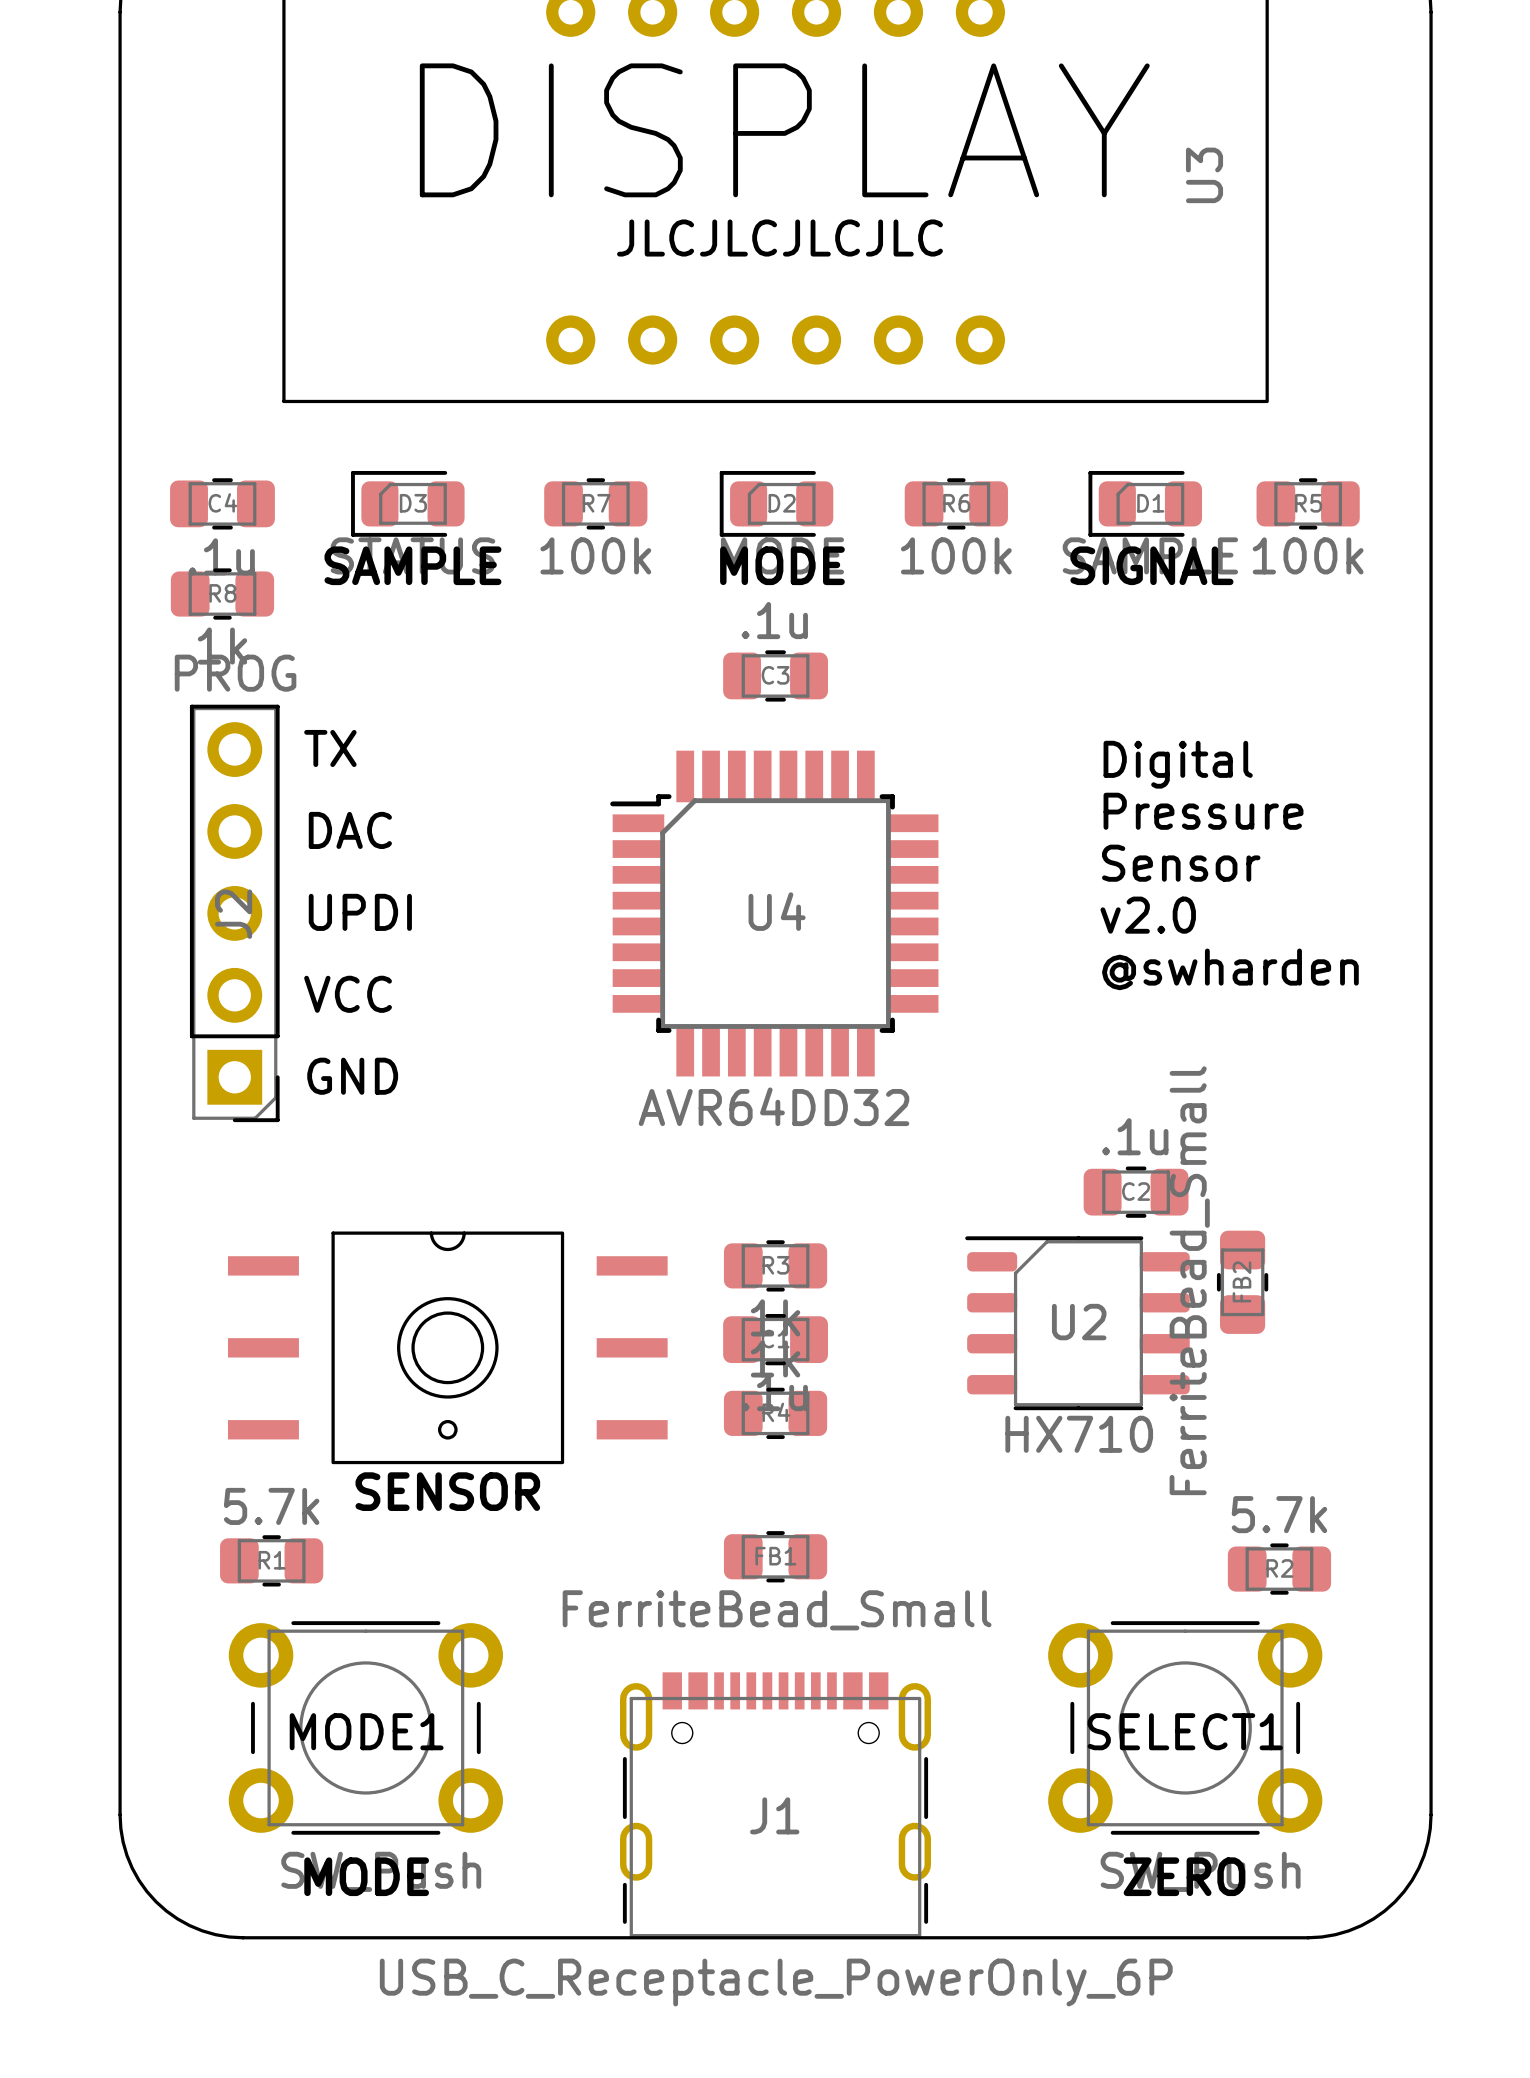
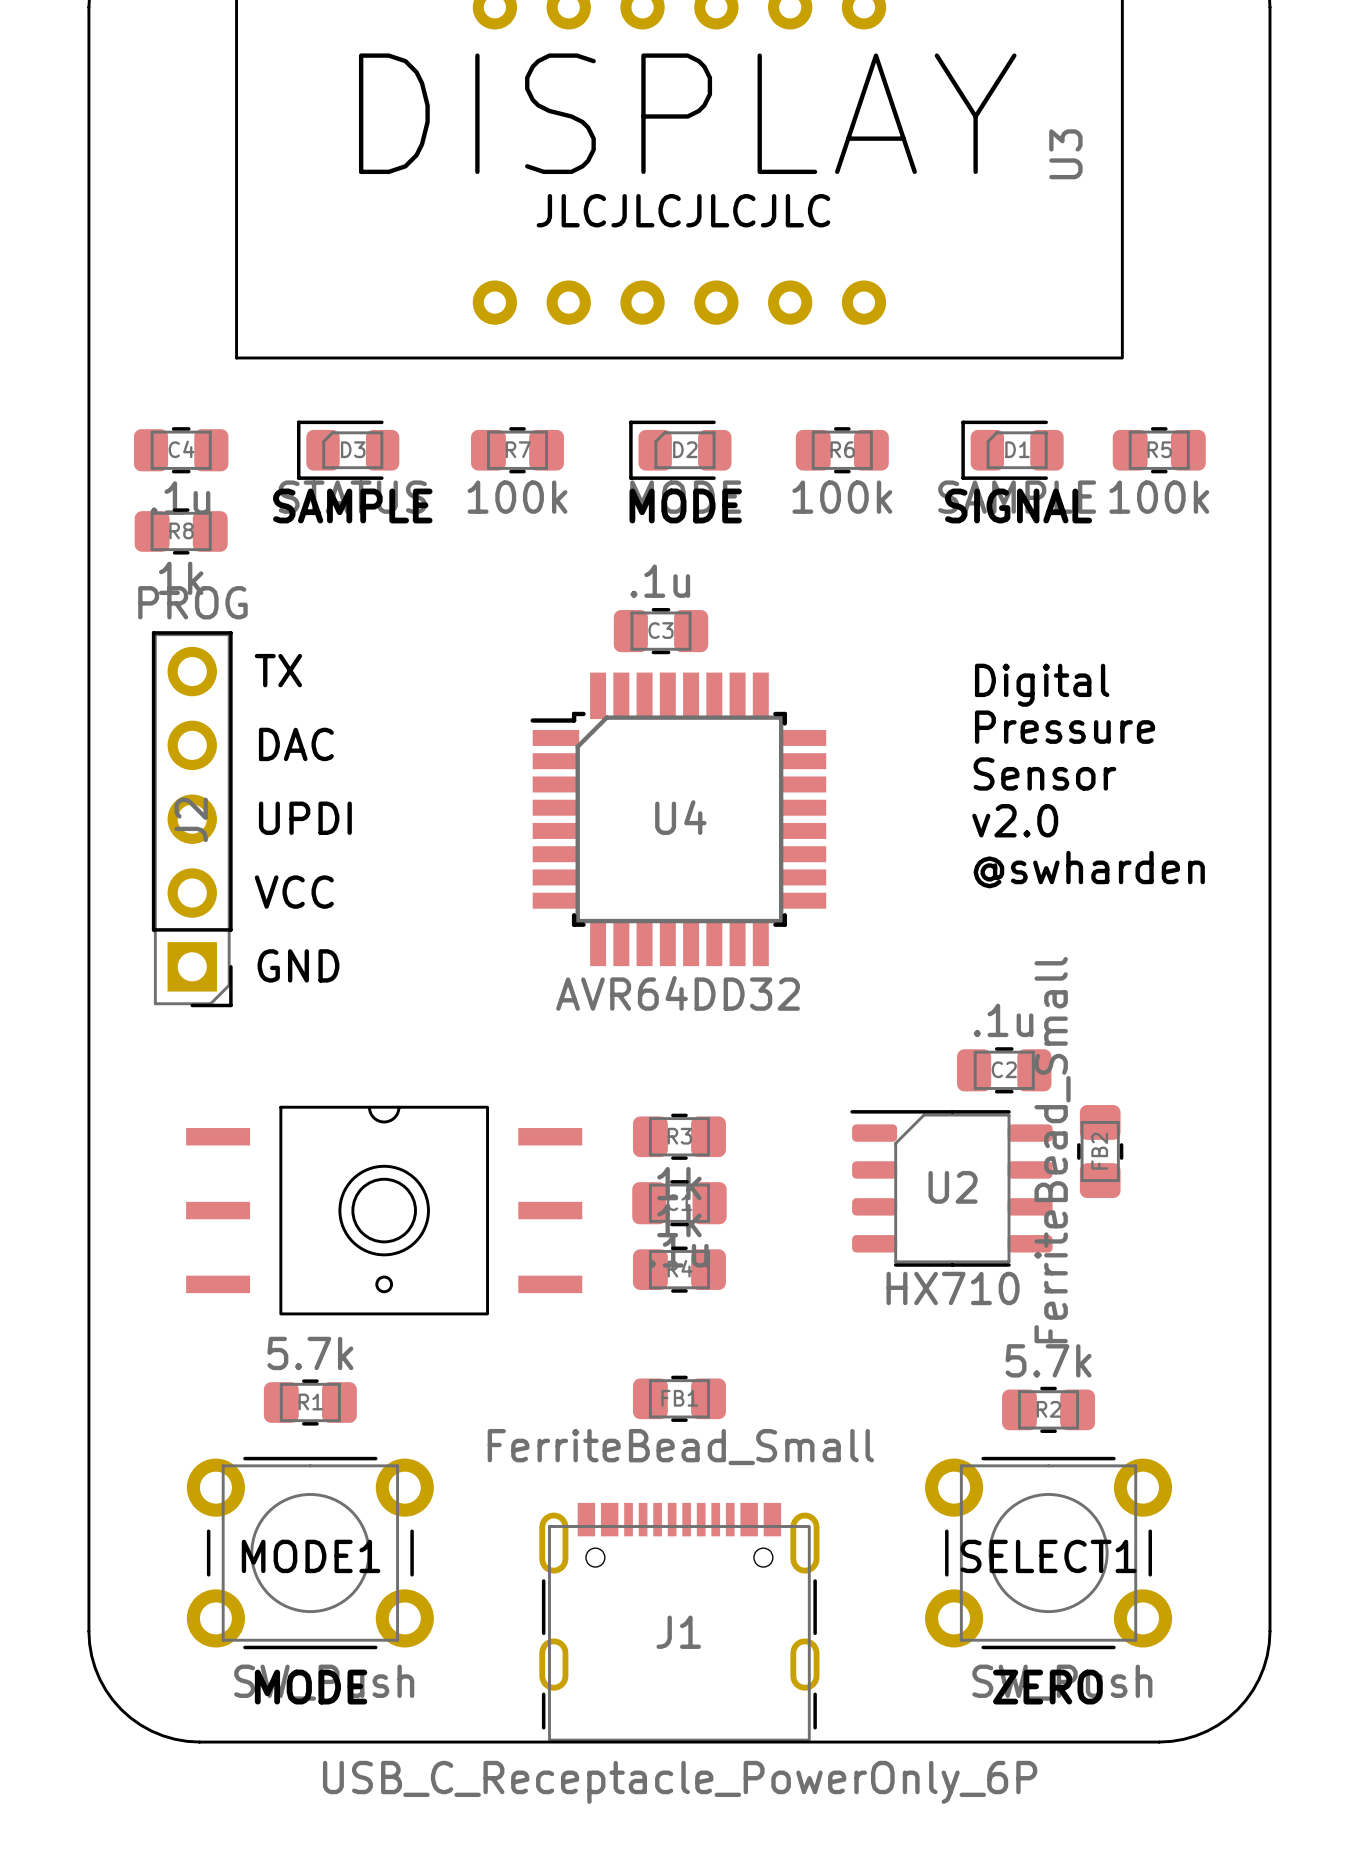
C3 position: (775, 675) -> (661, 631)
text: SENSOR (447, 1491) -> none
R1 position: (271, 1560) -> (310, 1402)
R2 position: (1279, 1569) -> (1048, 1409)

